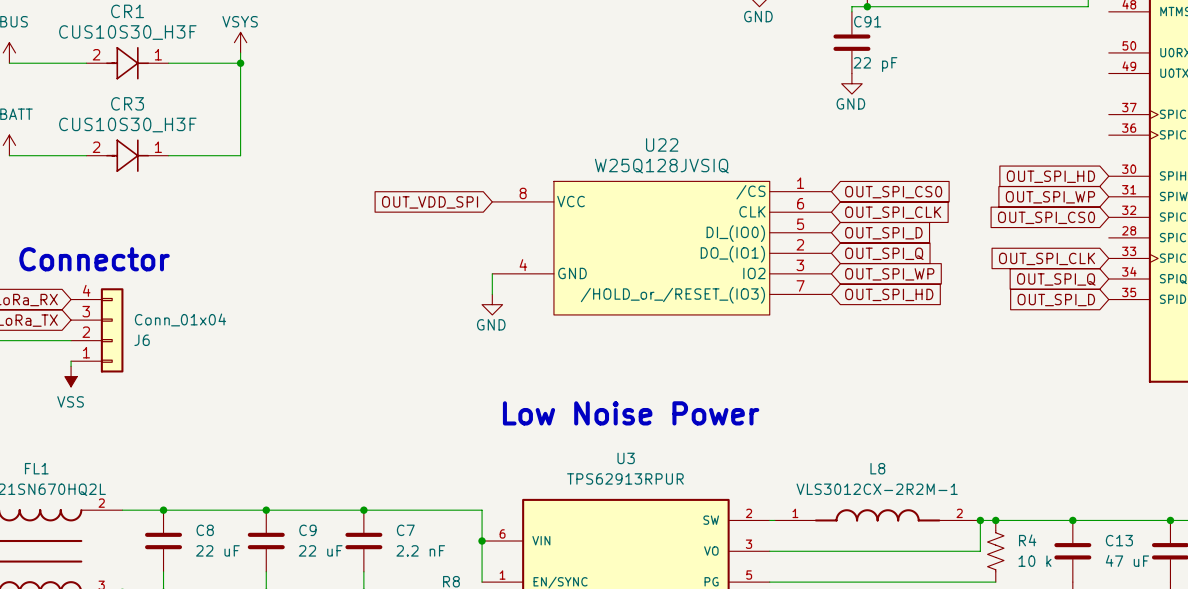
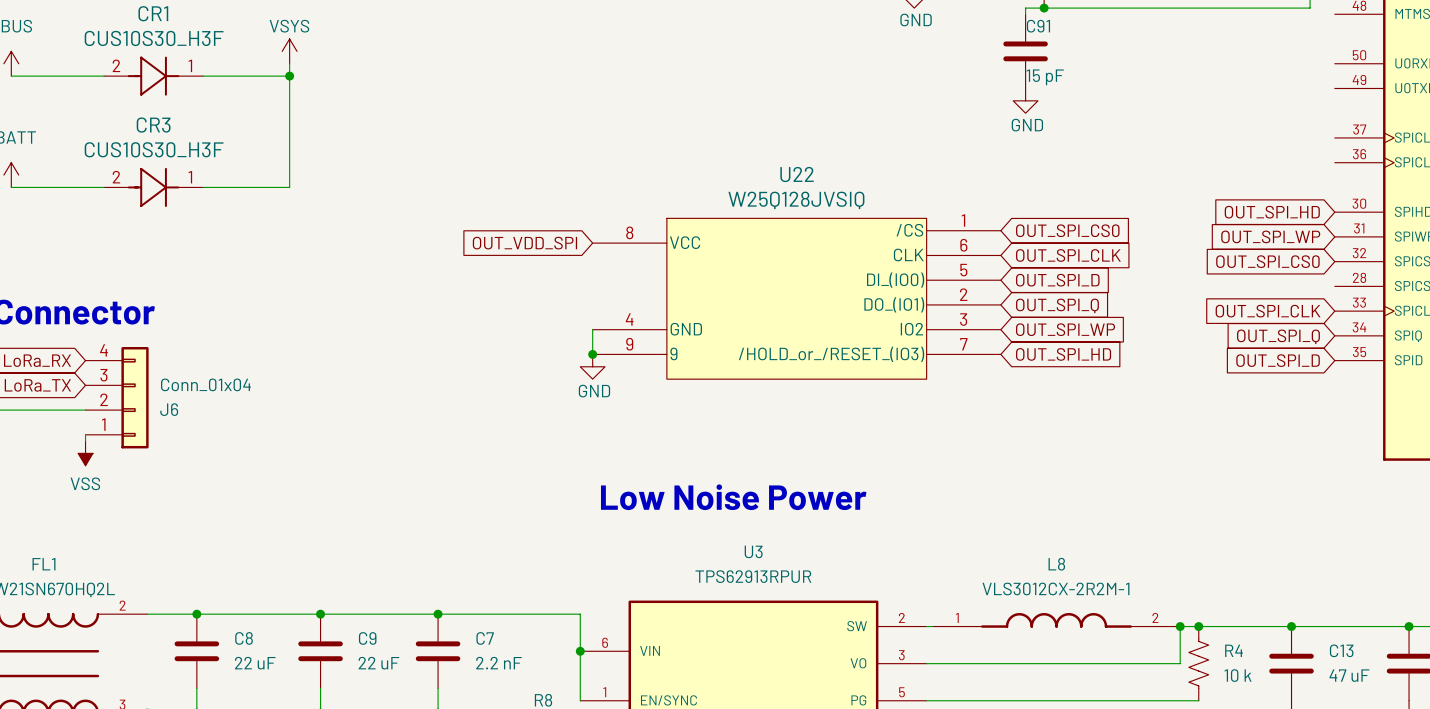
C91 value: 22 pF (875, 64) -> 15 pF (1045, 77)
U22 symbol: [492, 181, 832, 315] -> [592, 218, 1001, 380]
junction: none -> (592, 354)

